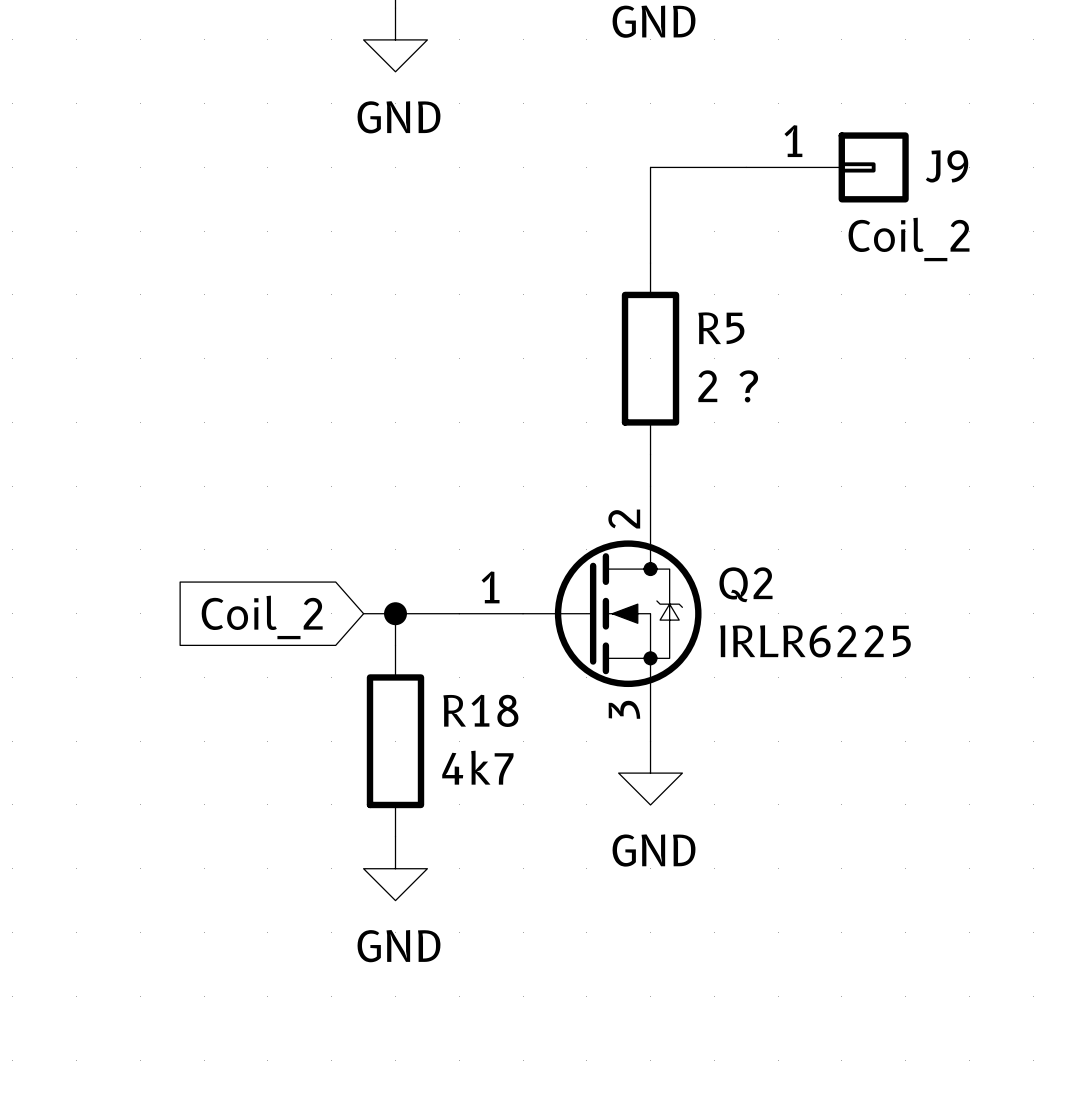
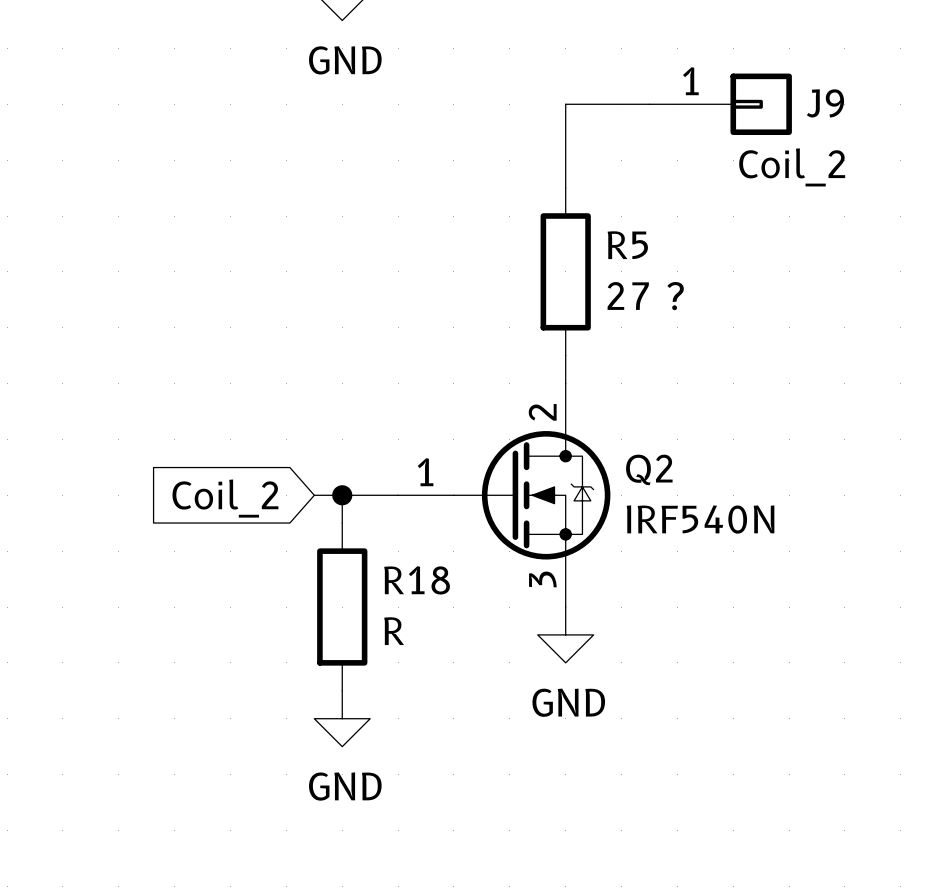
R5 value: 2 ? (728, 386) -> 27 ? (645, 296)
Q2 value: IRLR6225 (815, 641) -> IRF540N (700, 519)
R18 value: 4k7 (477, 767) -> R (394, 631)

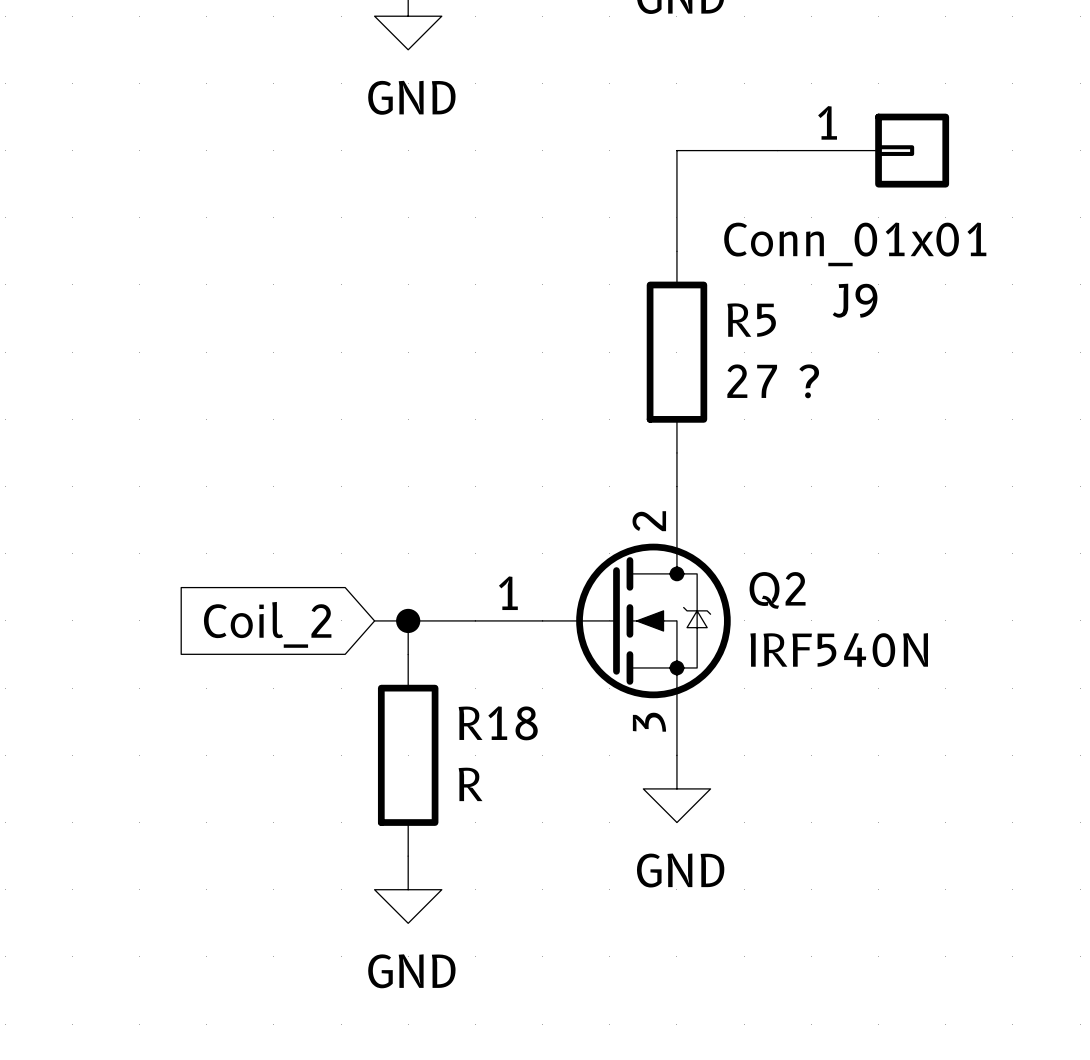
J9 name position: J9 (825, 103) -> J9 (855, 300)
J9 value: Coil_2 (792, 167) -> Conn_01x01 (855, 244)

